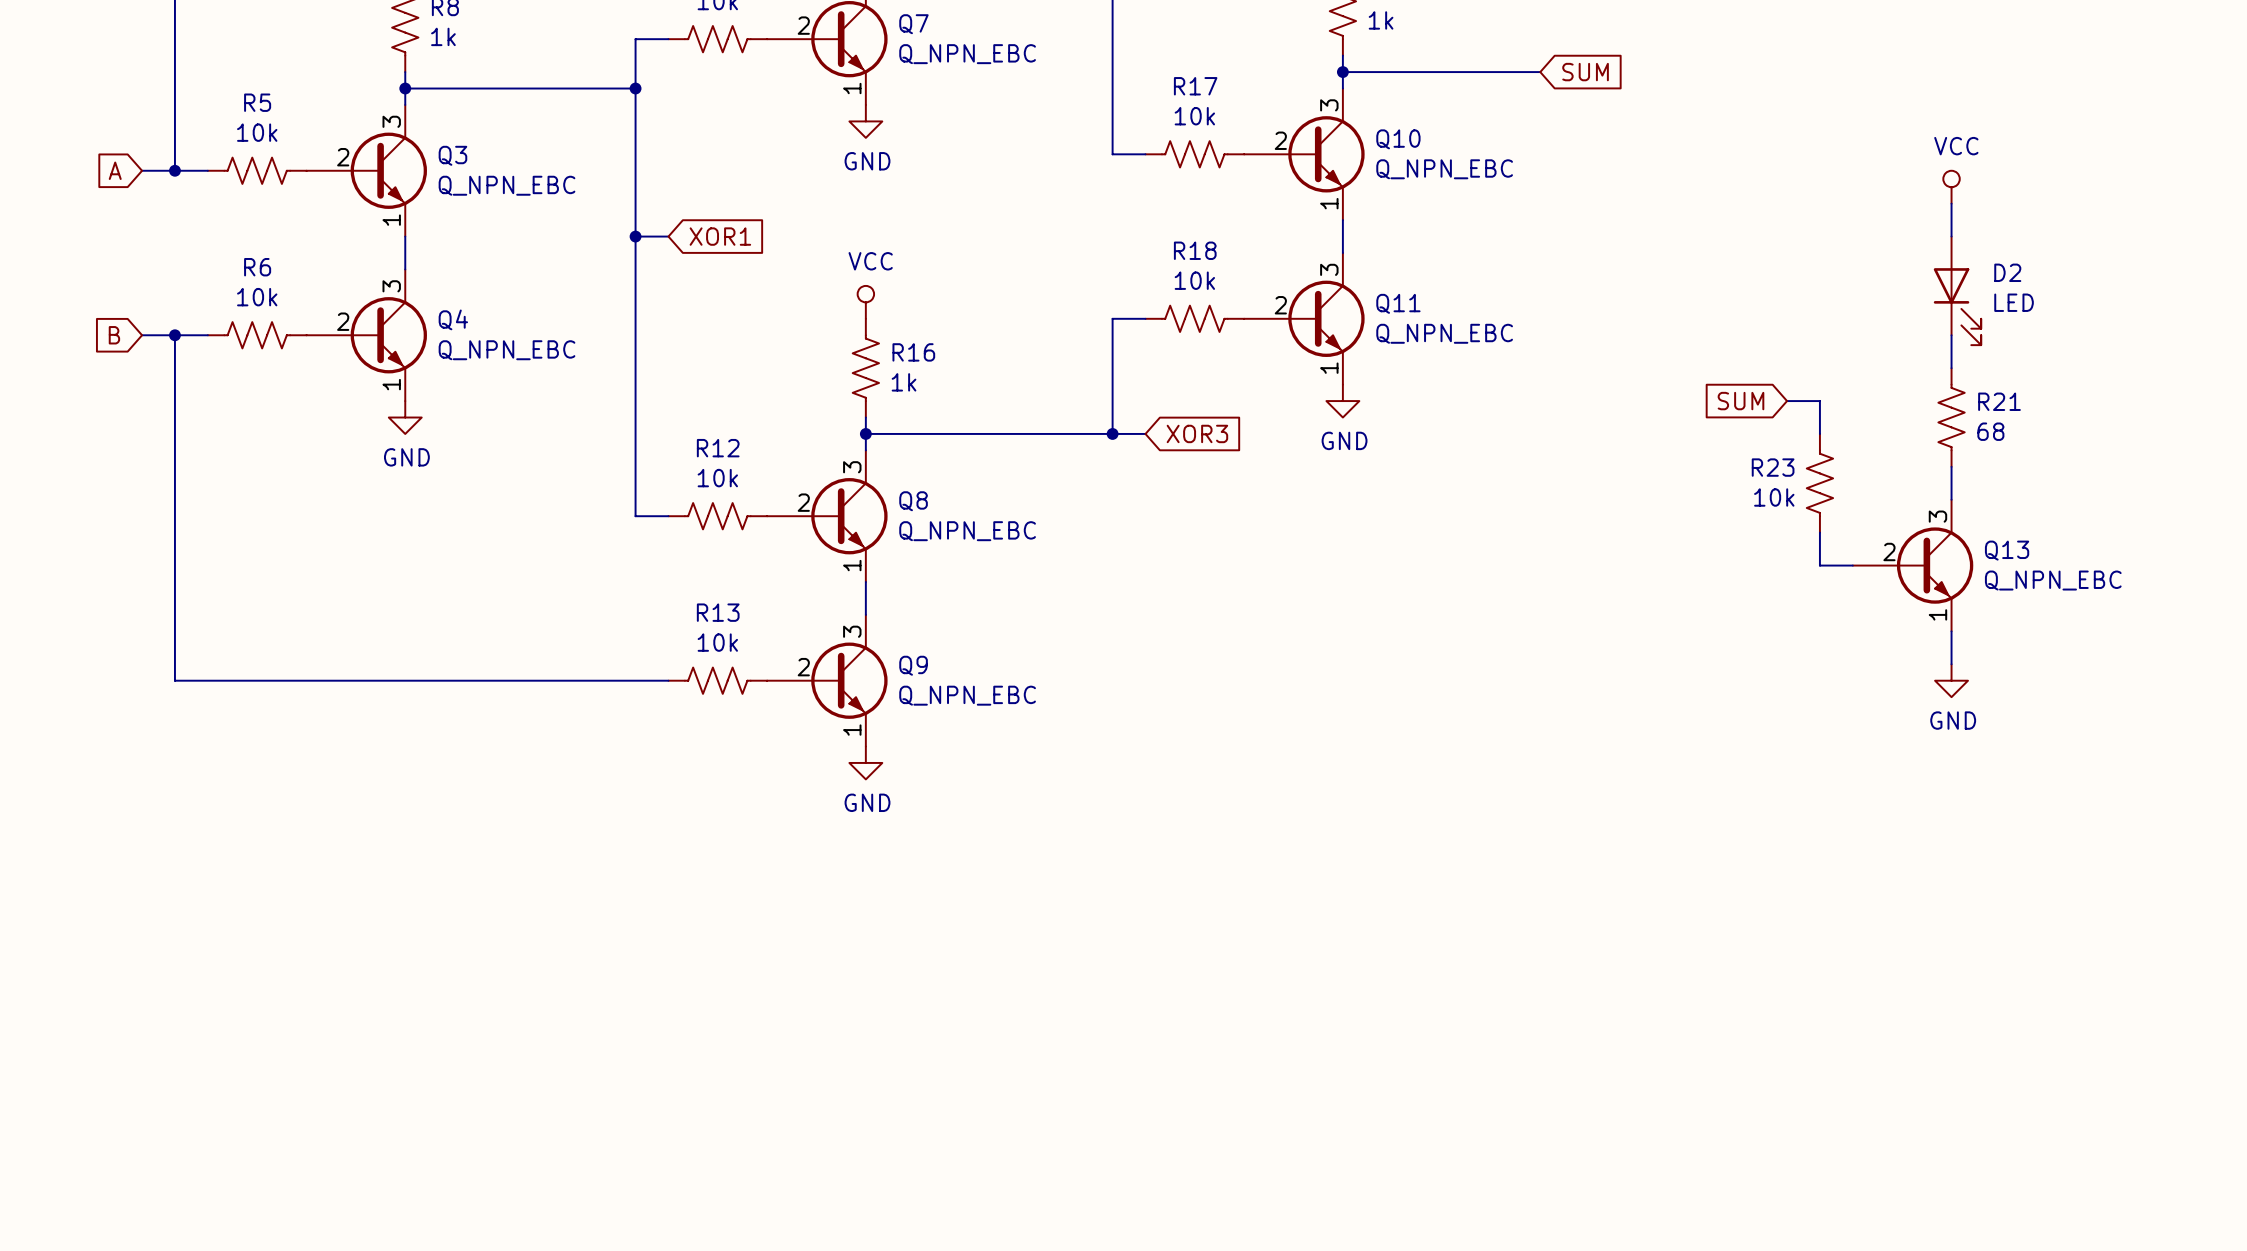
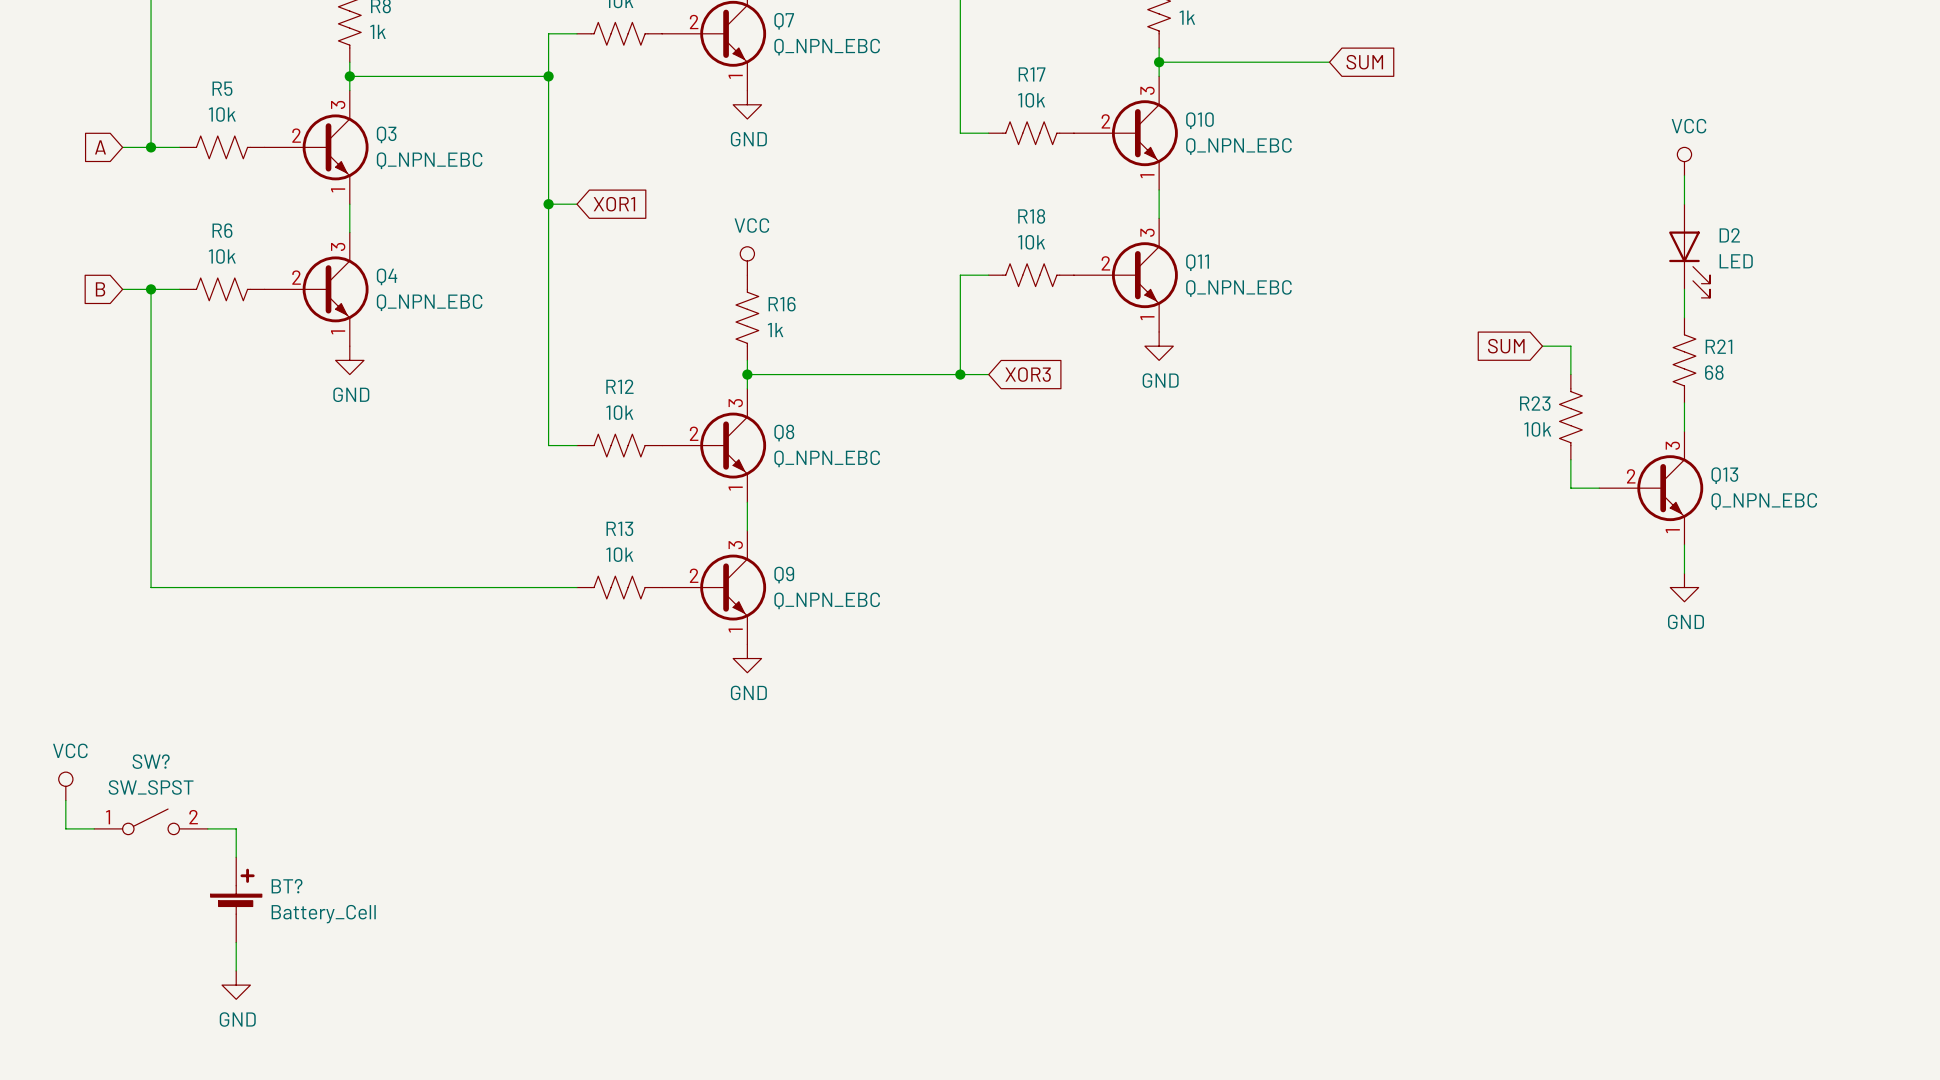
power symbol: none -> VCC (65, 786)
wire: none -> (65, 800) (65, 828) (94, 828)
SW?: none -> SW_SPST (151, 821)
wire: none -> (207, 828) (236, 828) (236, 857)
BT?: none -> Battery_Cell (236, 899)
wire: none -> (236, 942) (236, 970)
power symbol: none -> GND (236, 985)

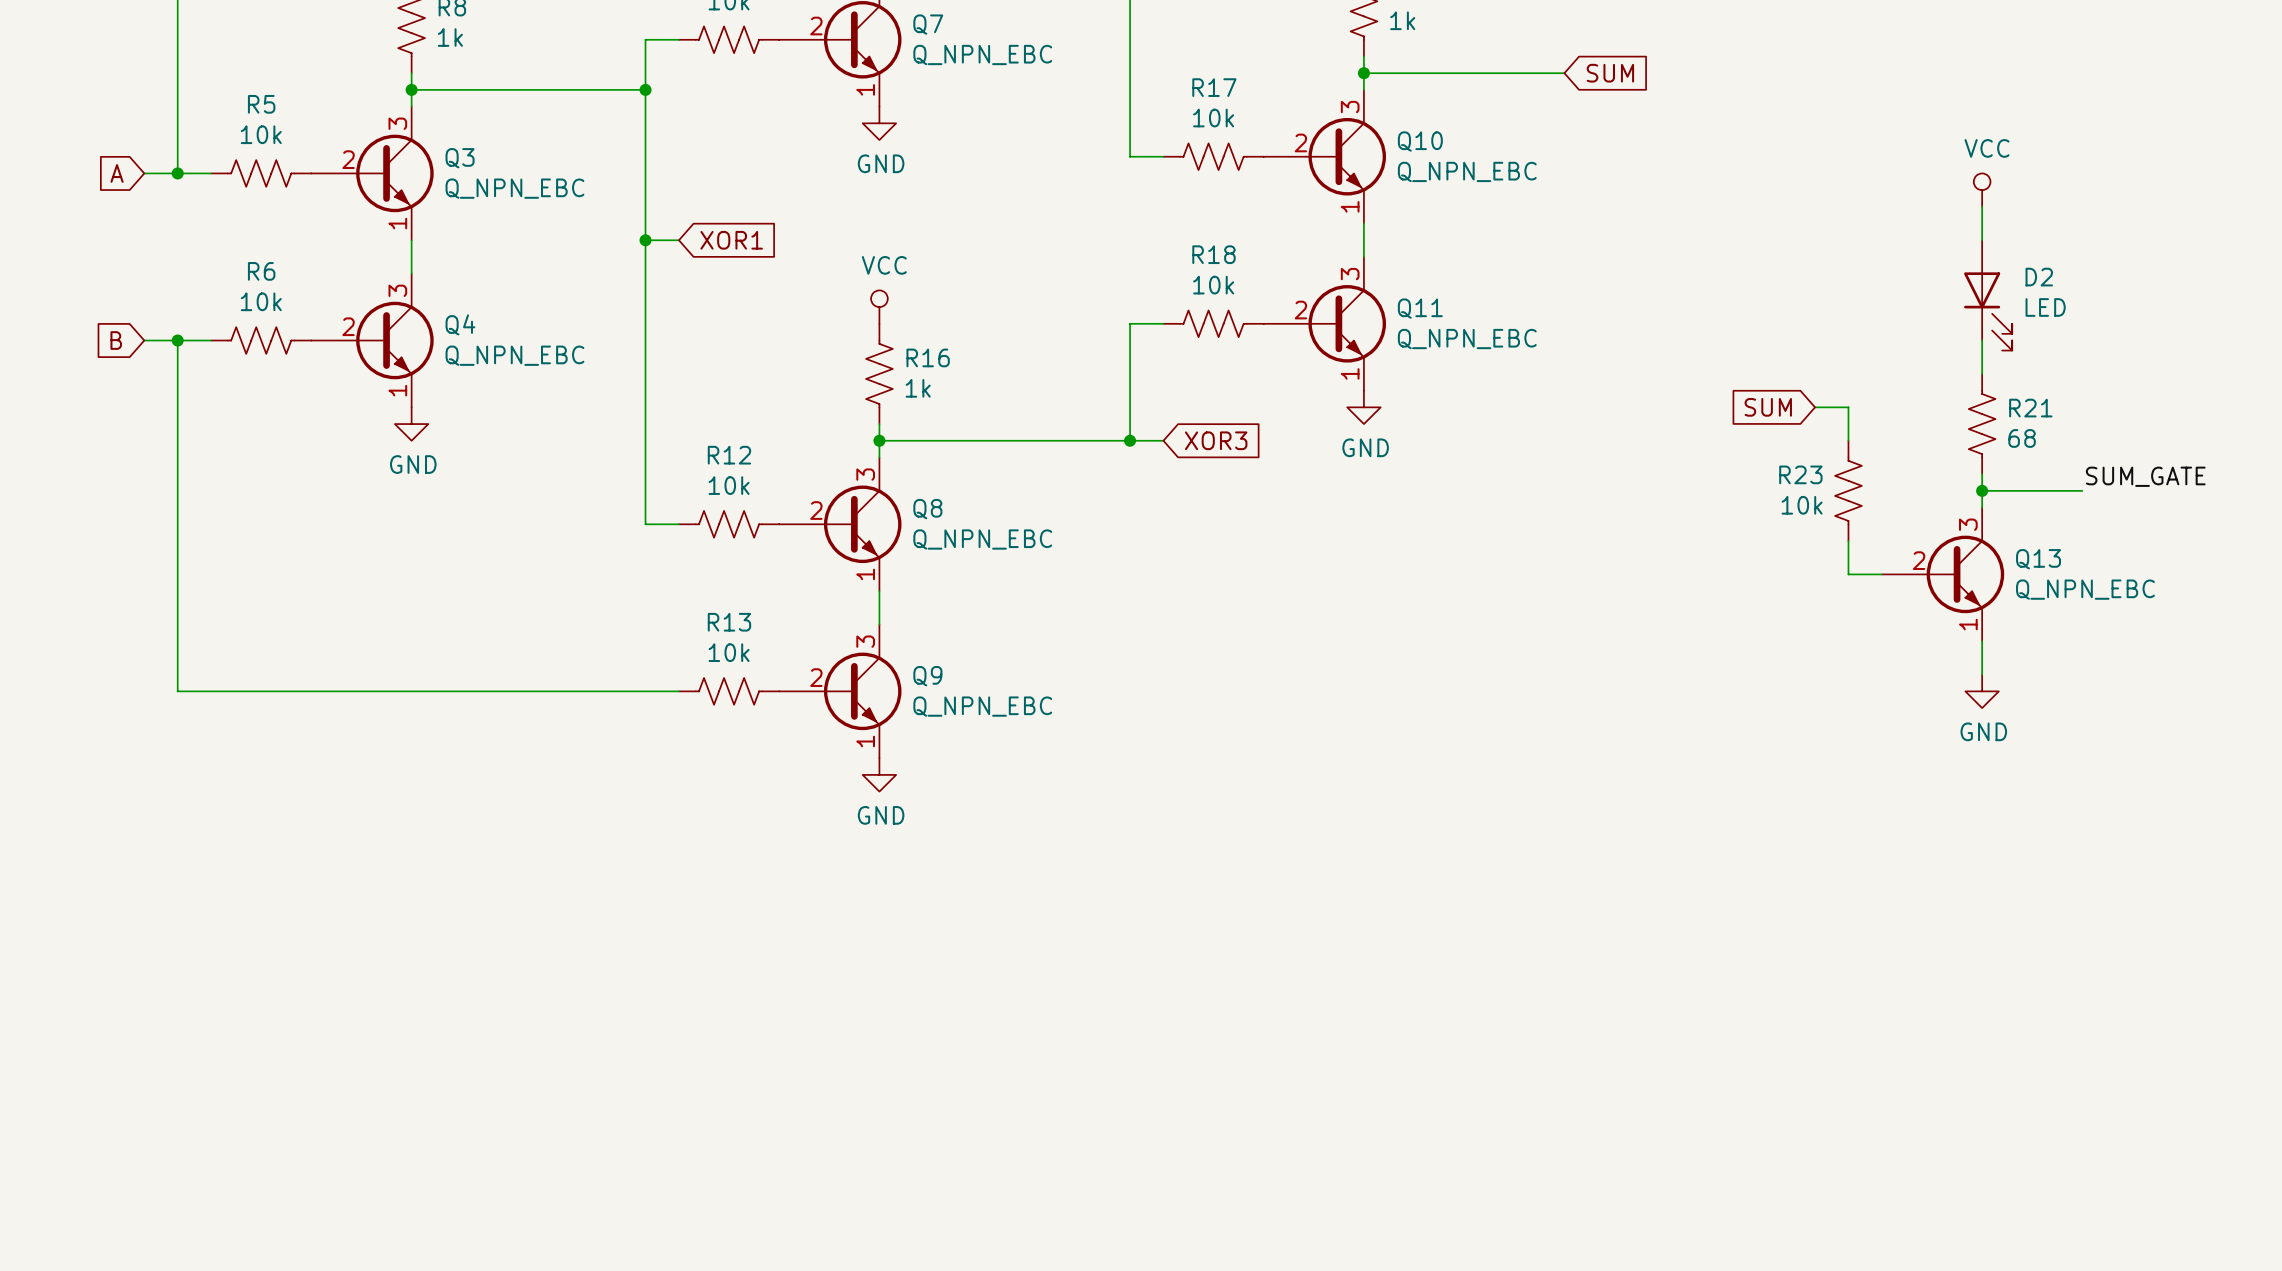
label: none -> SUM_GATE (2145, 476)
wire: none -> (1982, 490) (2082, 490)
junction: none -> (1982, 490)
power symbol: VCC (65, 786) -> none
wire: (65, 800) (65, 828) (94, 828) -> none
SW?: SW_SPST (151, 821) -> none
wire: (207, 828) (236, 828) (236, 857) -> none
BT?: Battery_Cell (236, 899) -> none
wire: (236, 942) (236, 970) -> none
power symbol: GND (236, 985) -> none

